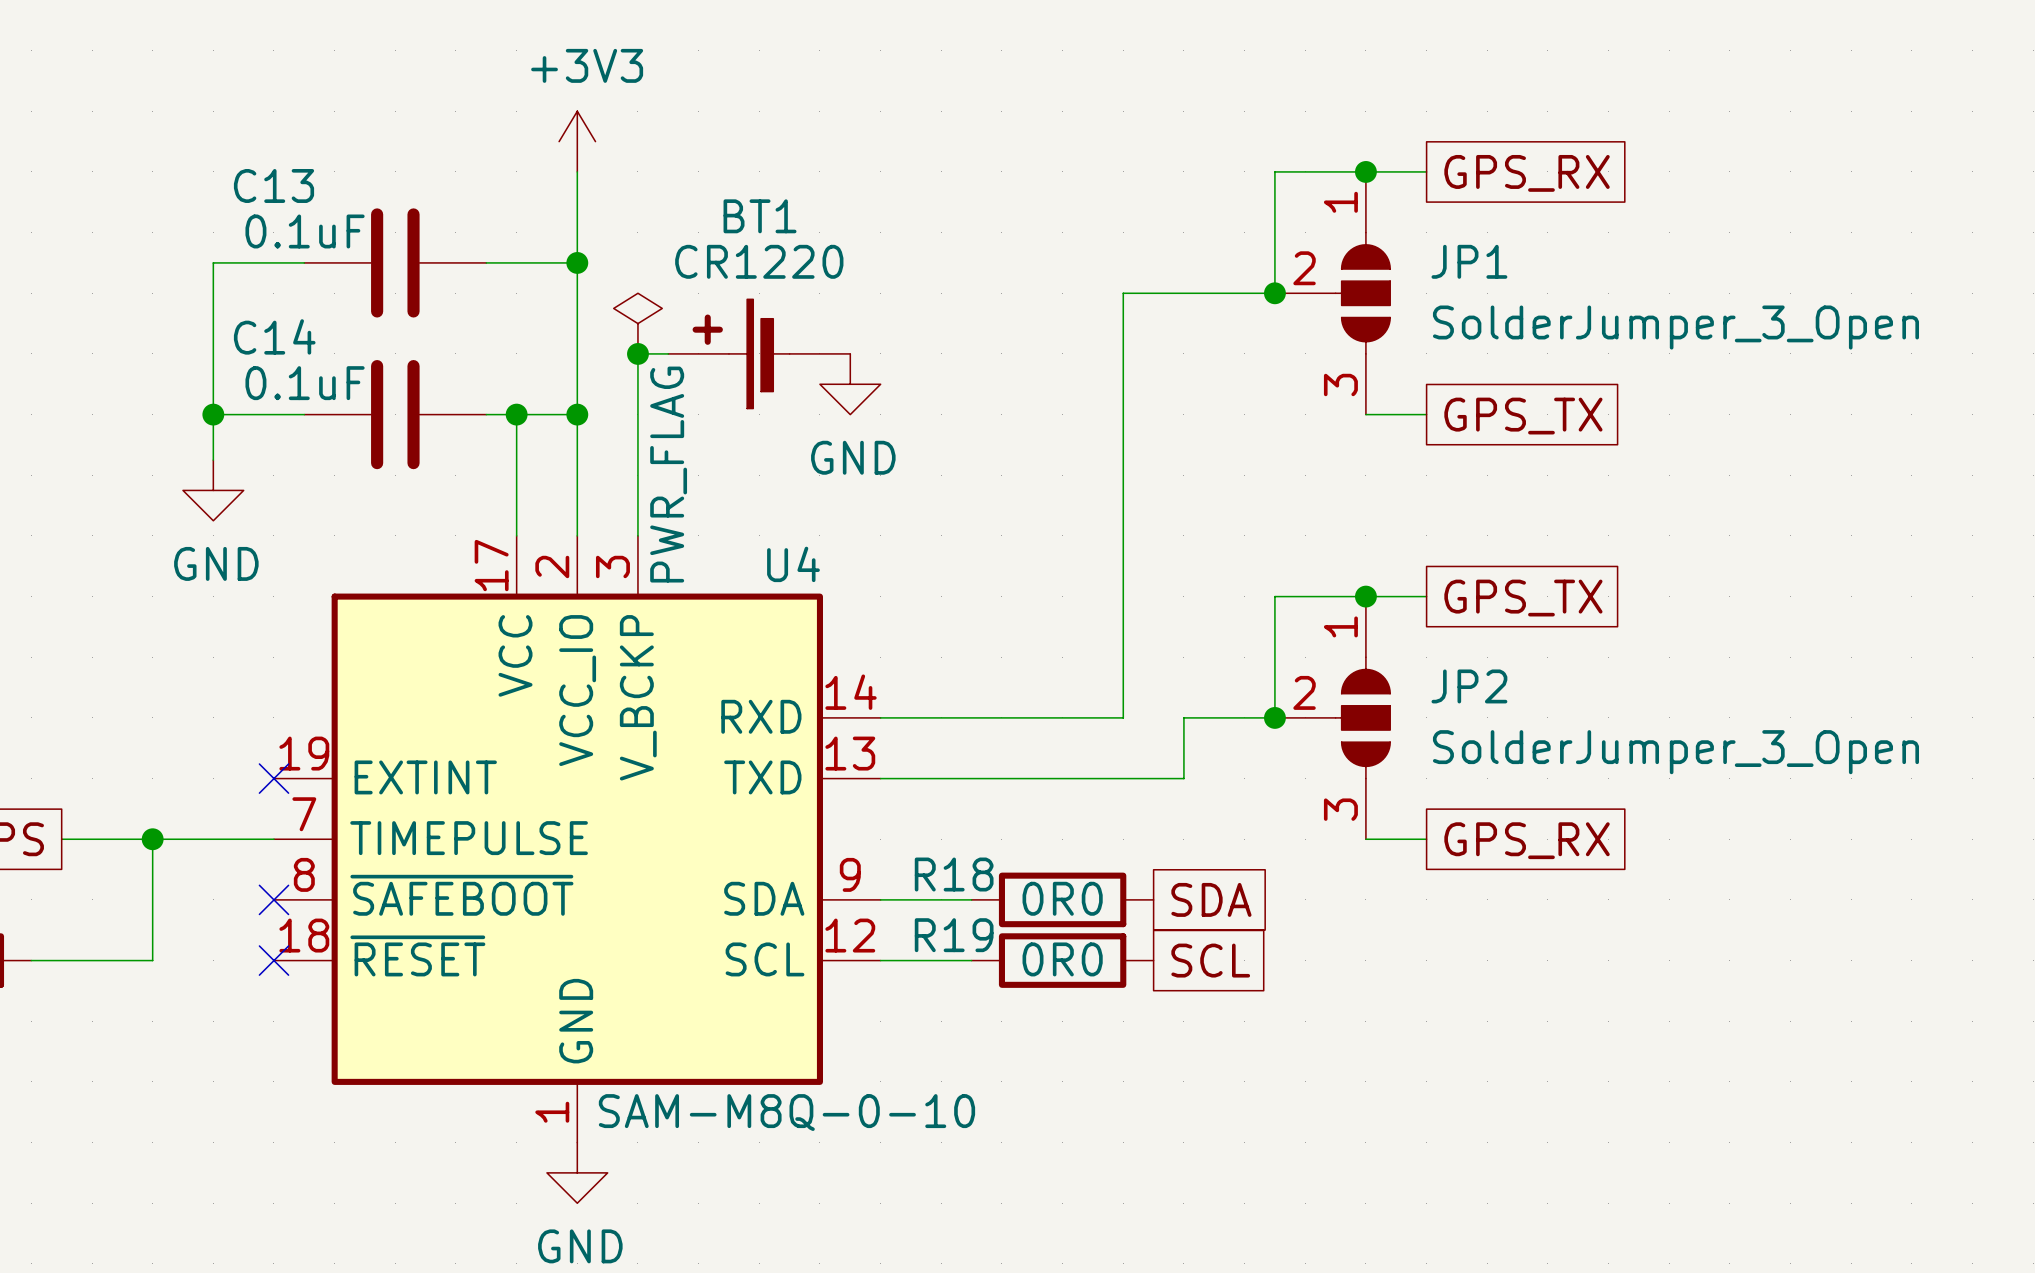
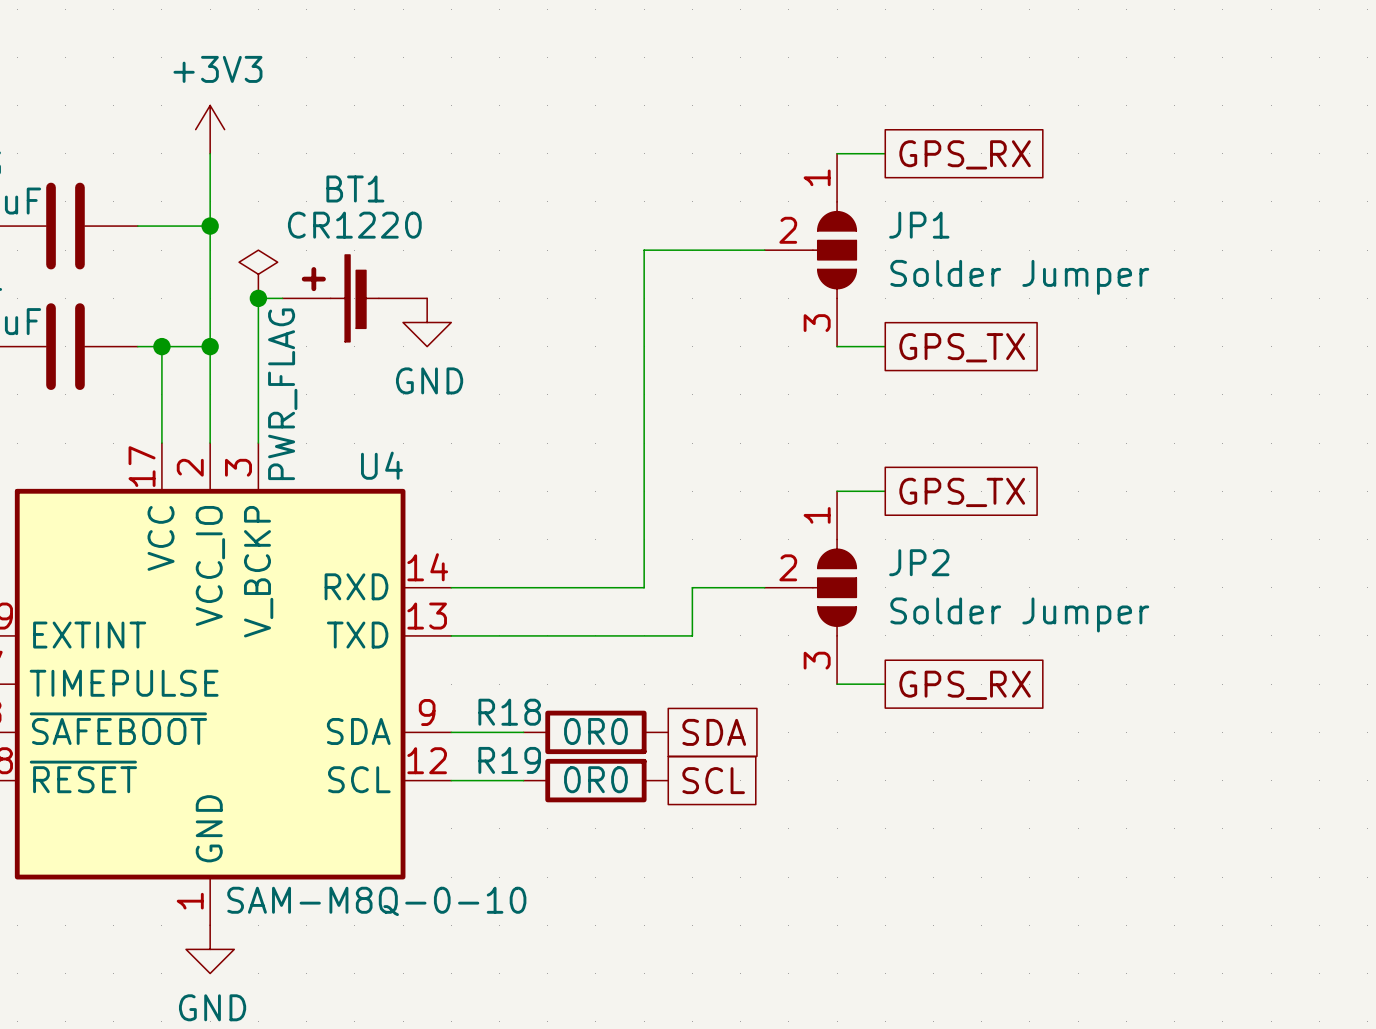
wire: (1365, 171) (1274, 171) (1274, 293) -> none
junction: (1365, 171) -> none
junction: (1274, 293) -> none
JP1 text: none -> Solder Jumper (1019, 277)
JP1 value: SolderJumper_3_Open (1675, 327) -> none
wire: (1365, 596) (1274, 596) (1274, 717) -> none
junction: (1365, 596) -> none
junction: (1274, 717) -> none
JP2 text: none -> Solder Jumper (1019, 614)
JP2 value: SolderJumper_3_Open (1675, 752) -> none

